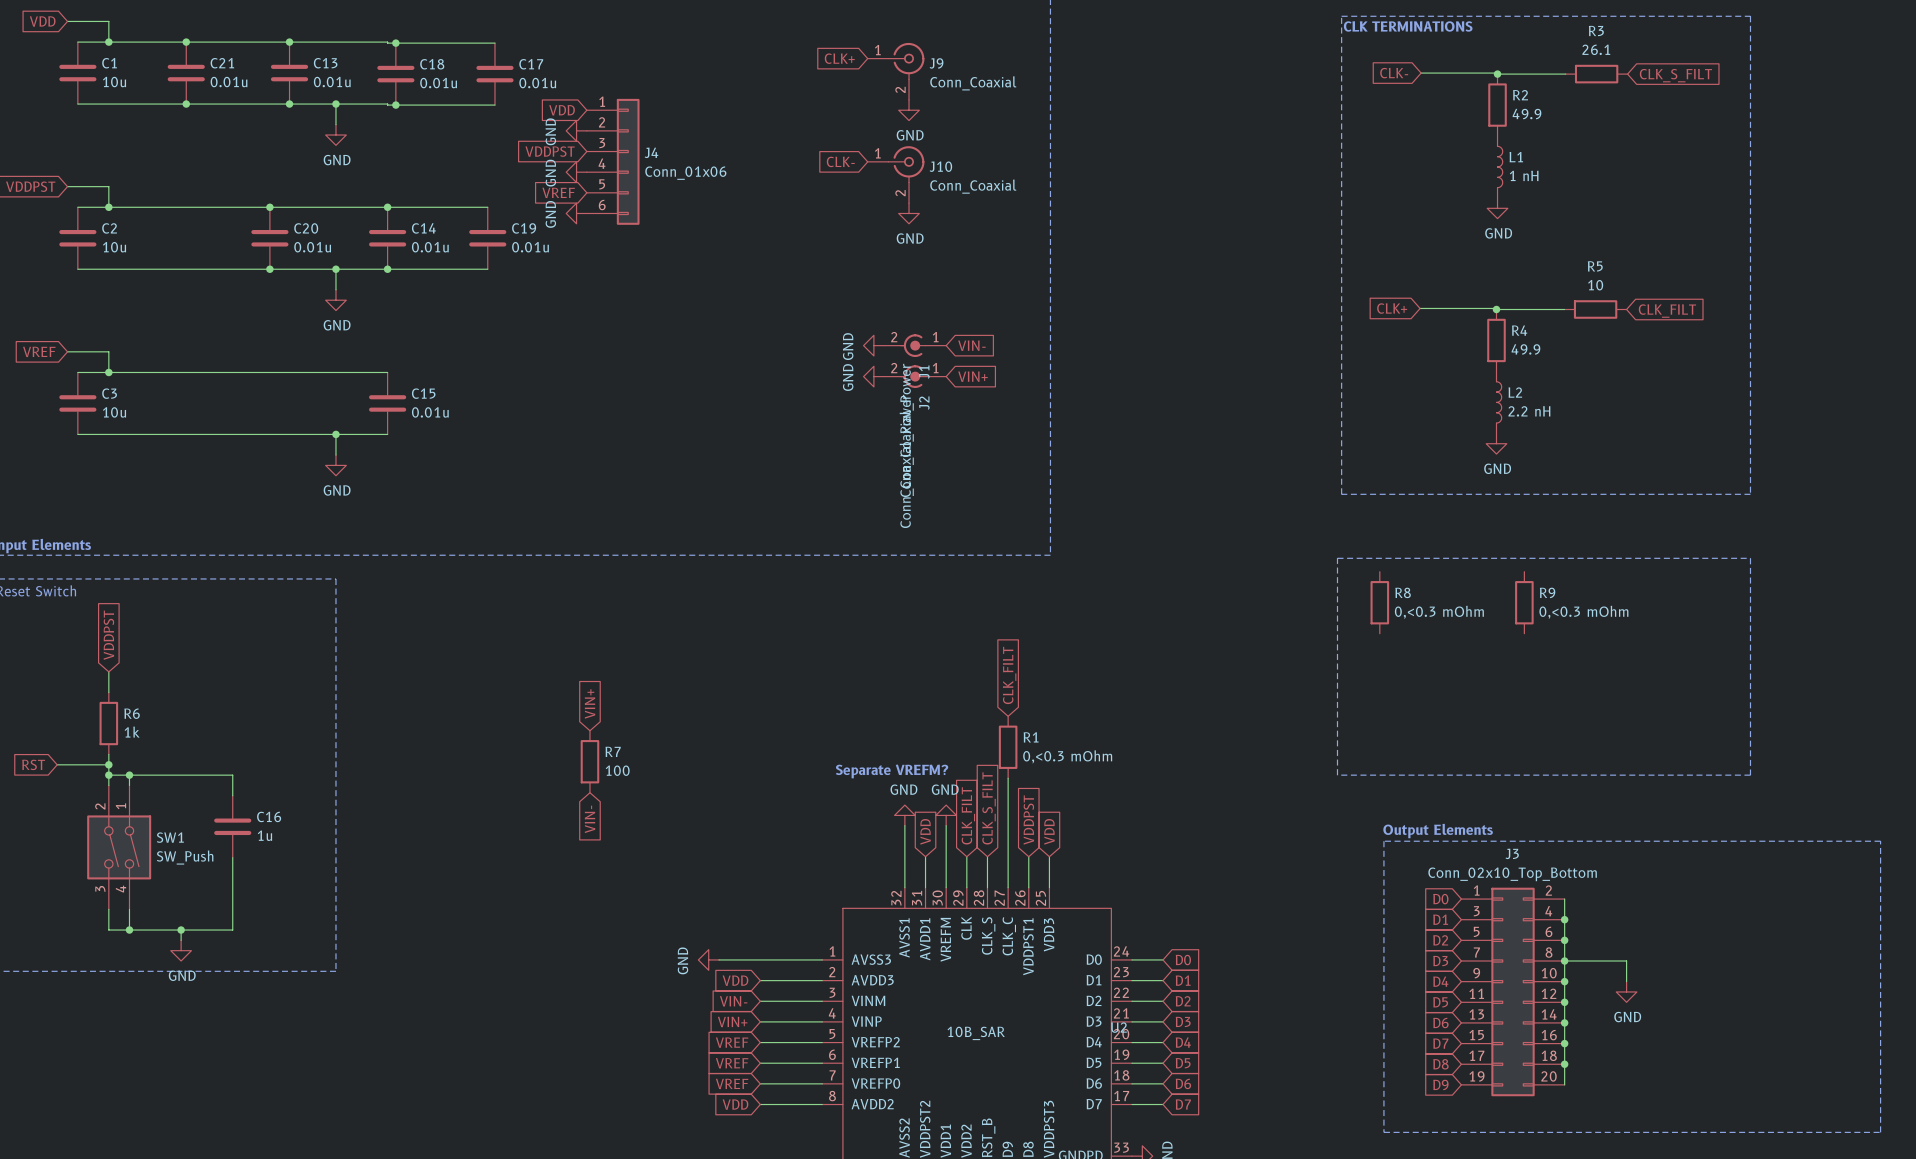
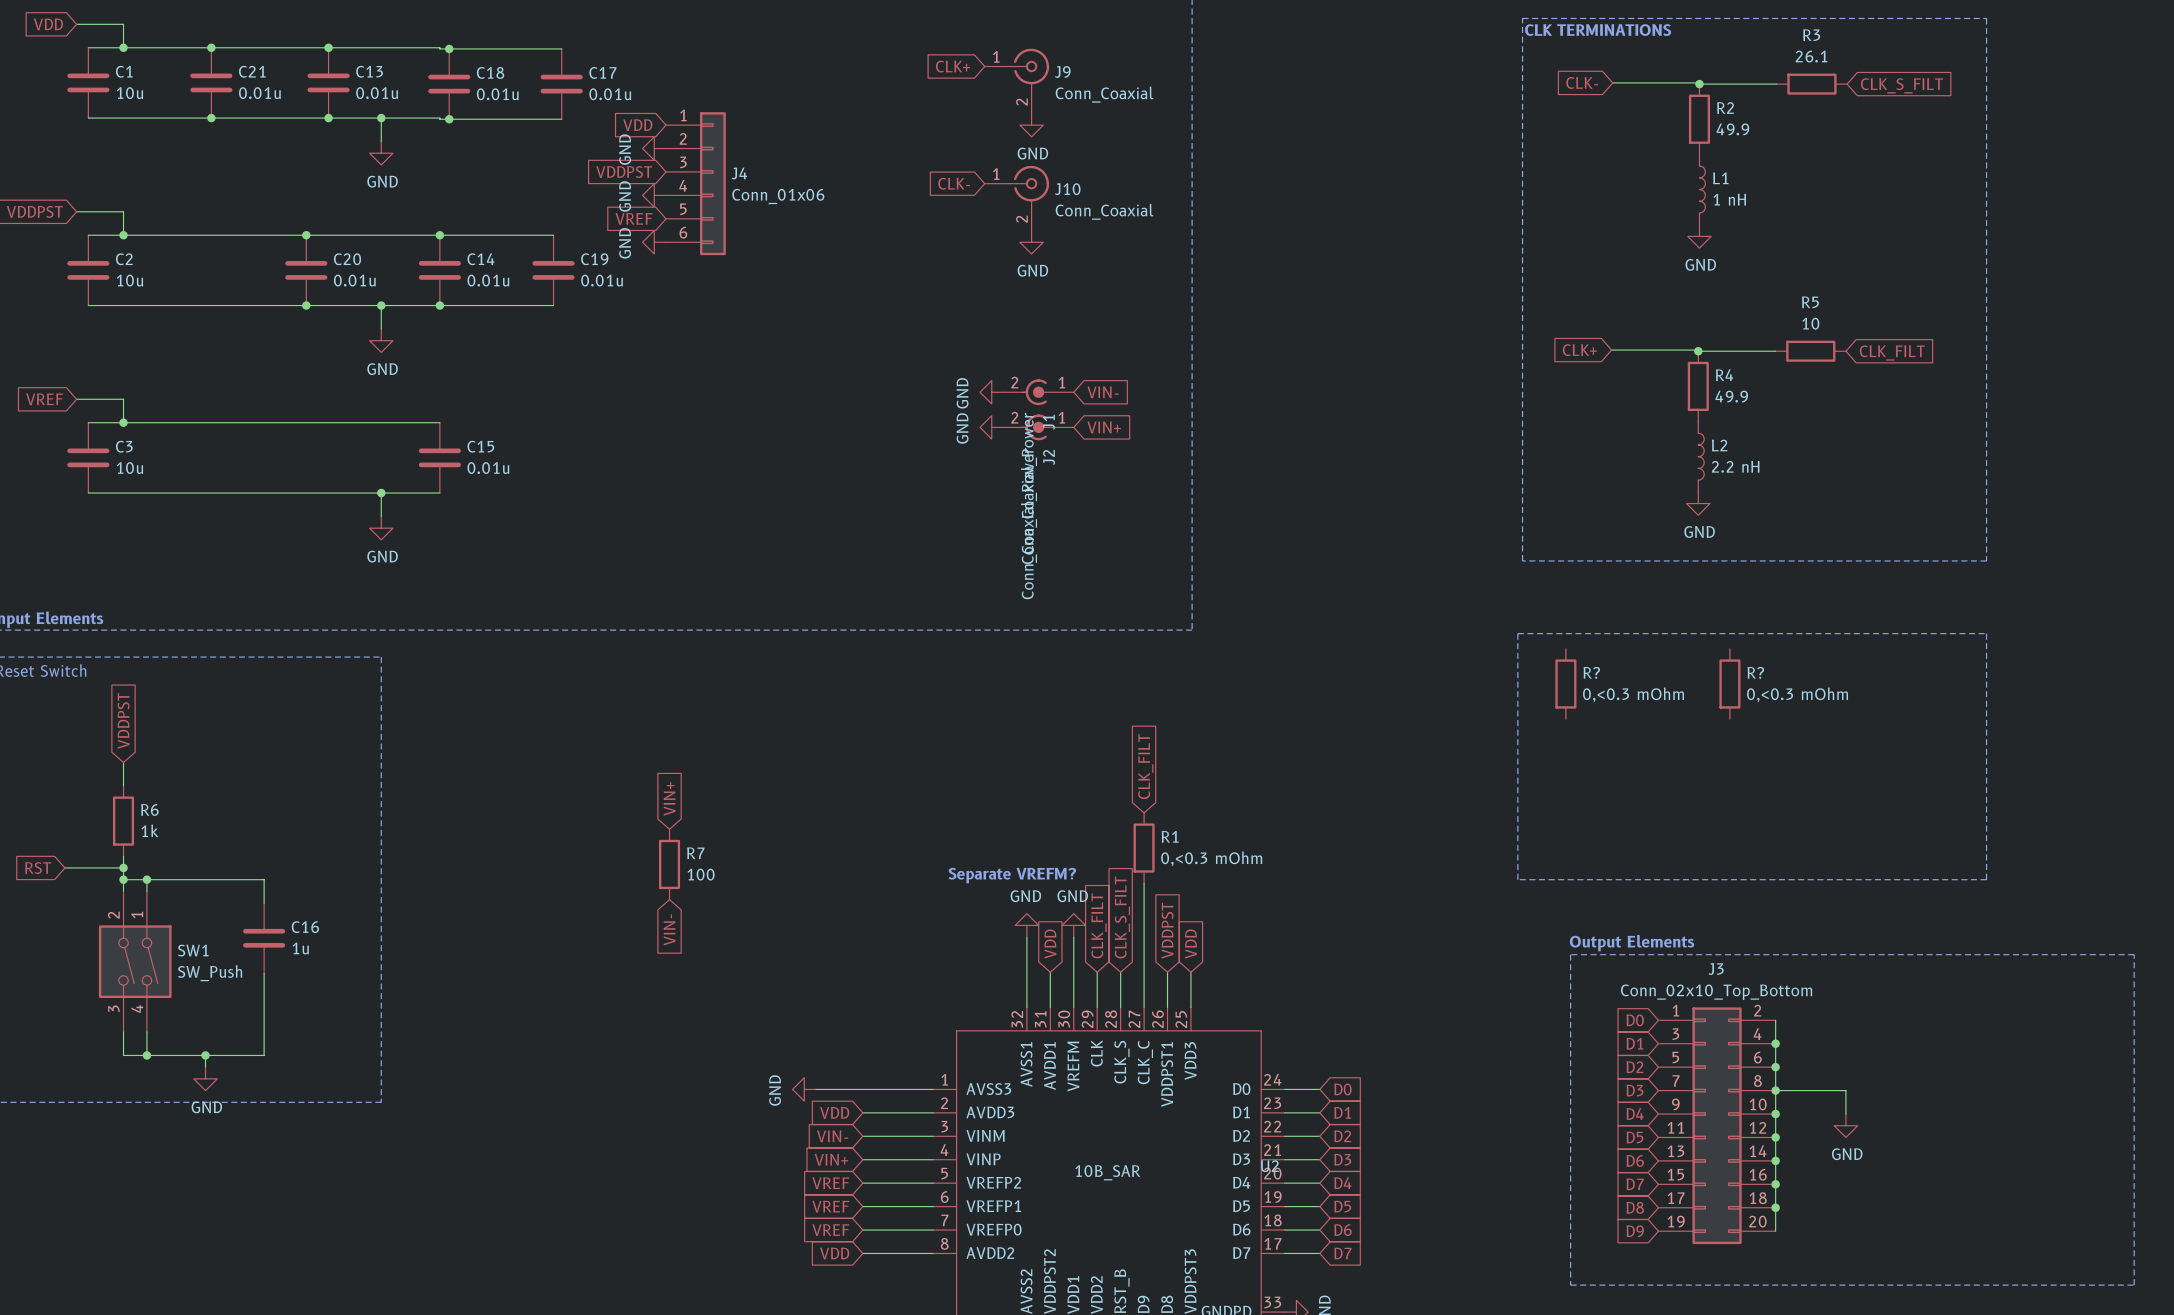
R8 name: R8 (1403, 592) -> R? (1591, 672)
R9 name: R9 (1547, 592) -> R? (1755, 672)

